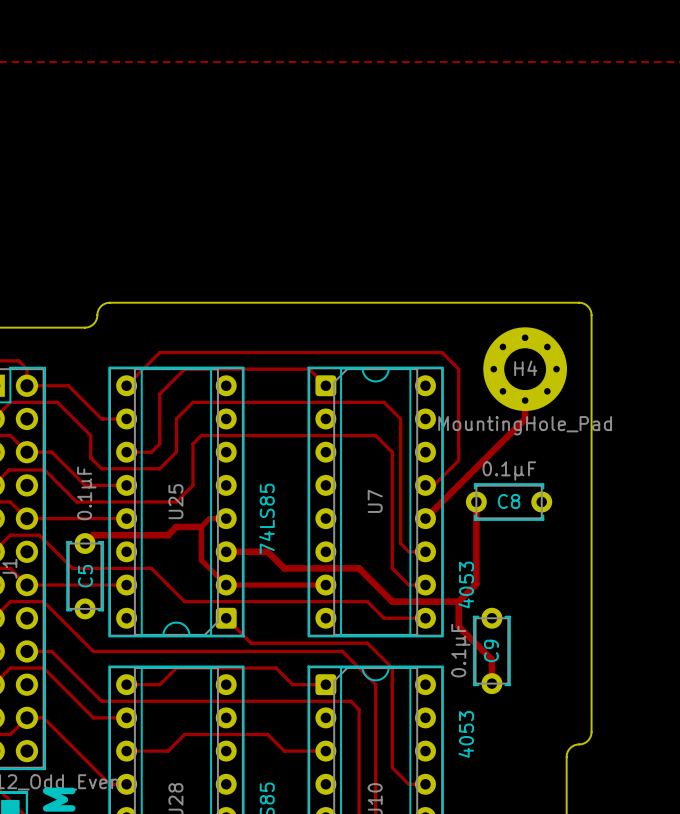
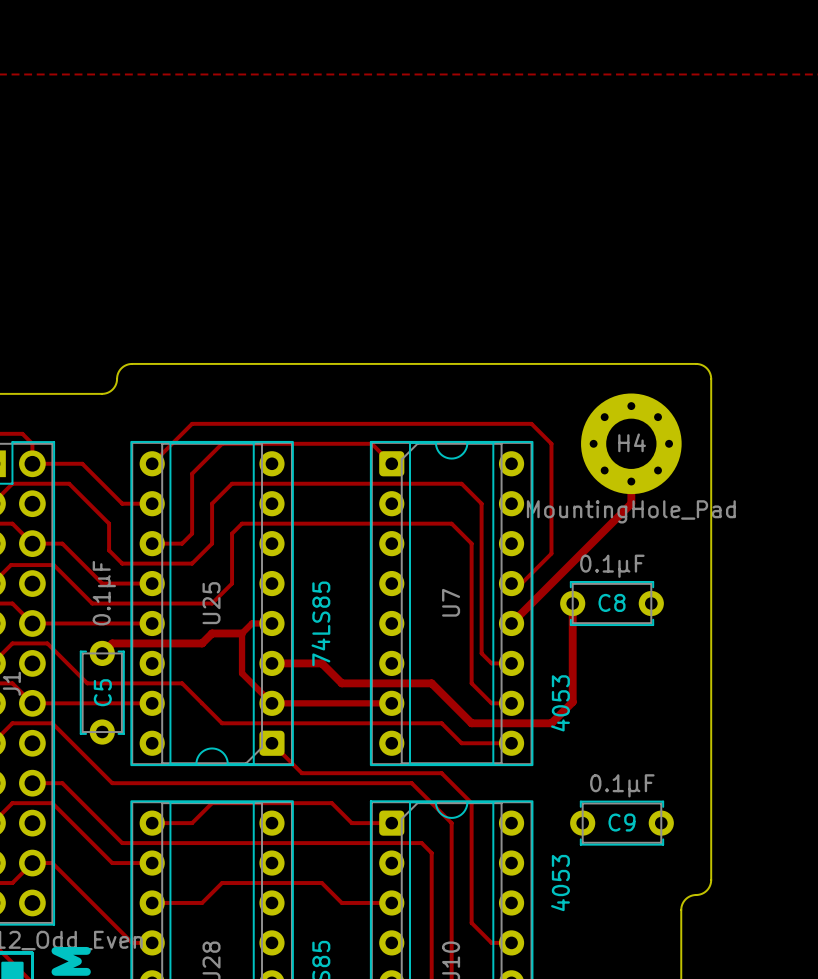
track: (458, 601) (458, 626) (491, 659) (491, 683) -> none
C9 rotation: 0° (491, 650) -> 90° clockwise (621, 823)

